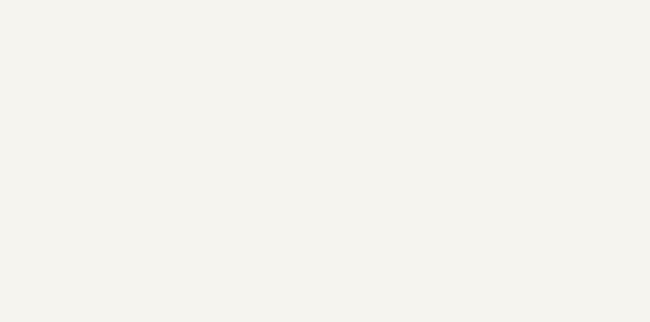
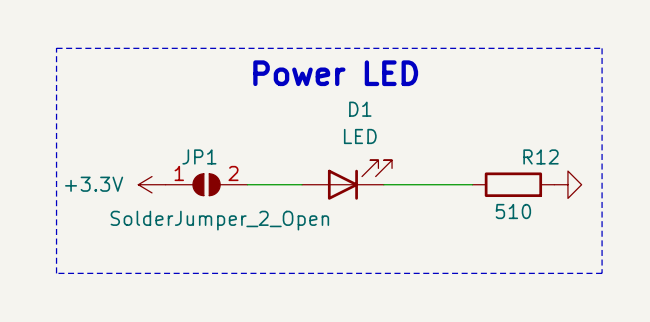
line: none -> (56, 48) (602, 48) (602, 273) (56, 273) (56, 48)
text: none -> Power LED (335, 73)
D1: none -> LED (347, 179)
power symbol: none -> +3.3V (152, 184)
JP1: none -> SolderJumper_2_Open (206, 184)
wire: none -> (247, 184) (302, 184)
wire: none -> (383, 184) (472, 184)
R12: none -> 510 (513, 184)
power symbol: none -> (567, 184)

